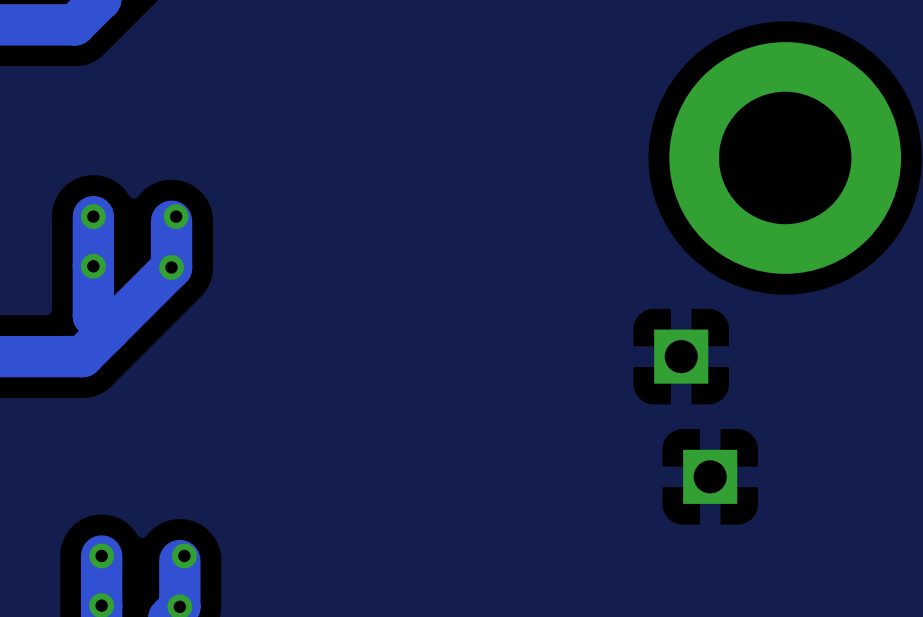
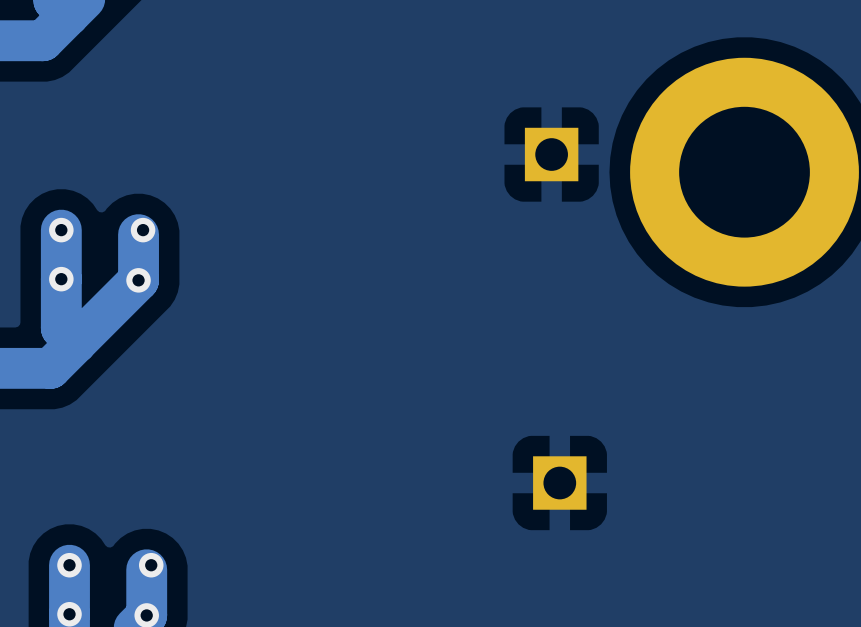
part: none -> (551, 154)
part: (681, 356) -> none
part: none -> (559, 483)
part: (710, 476) -> none

